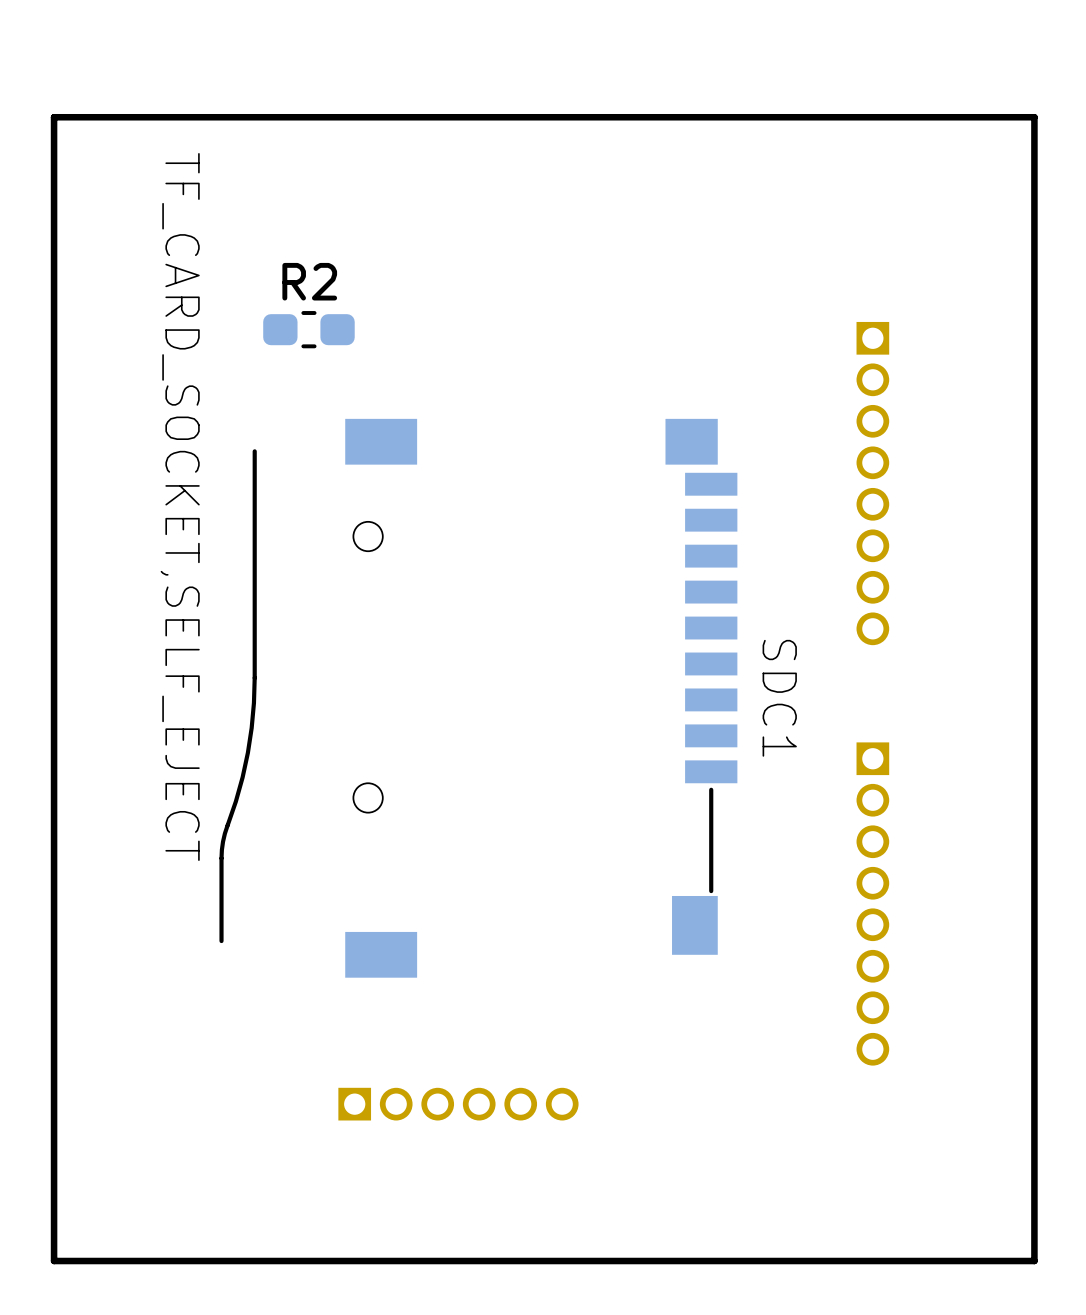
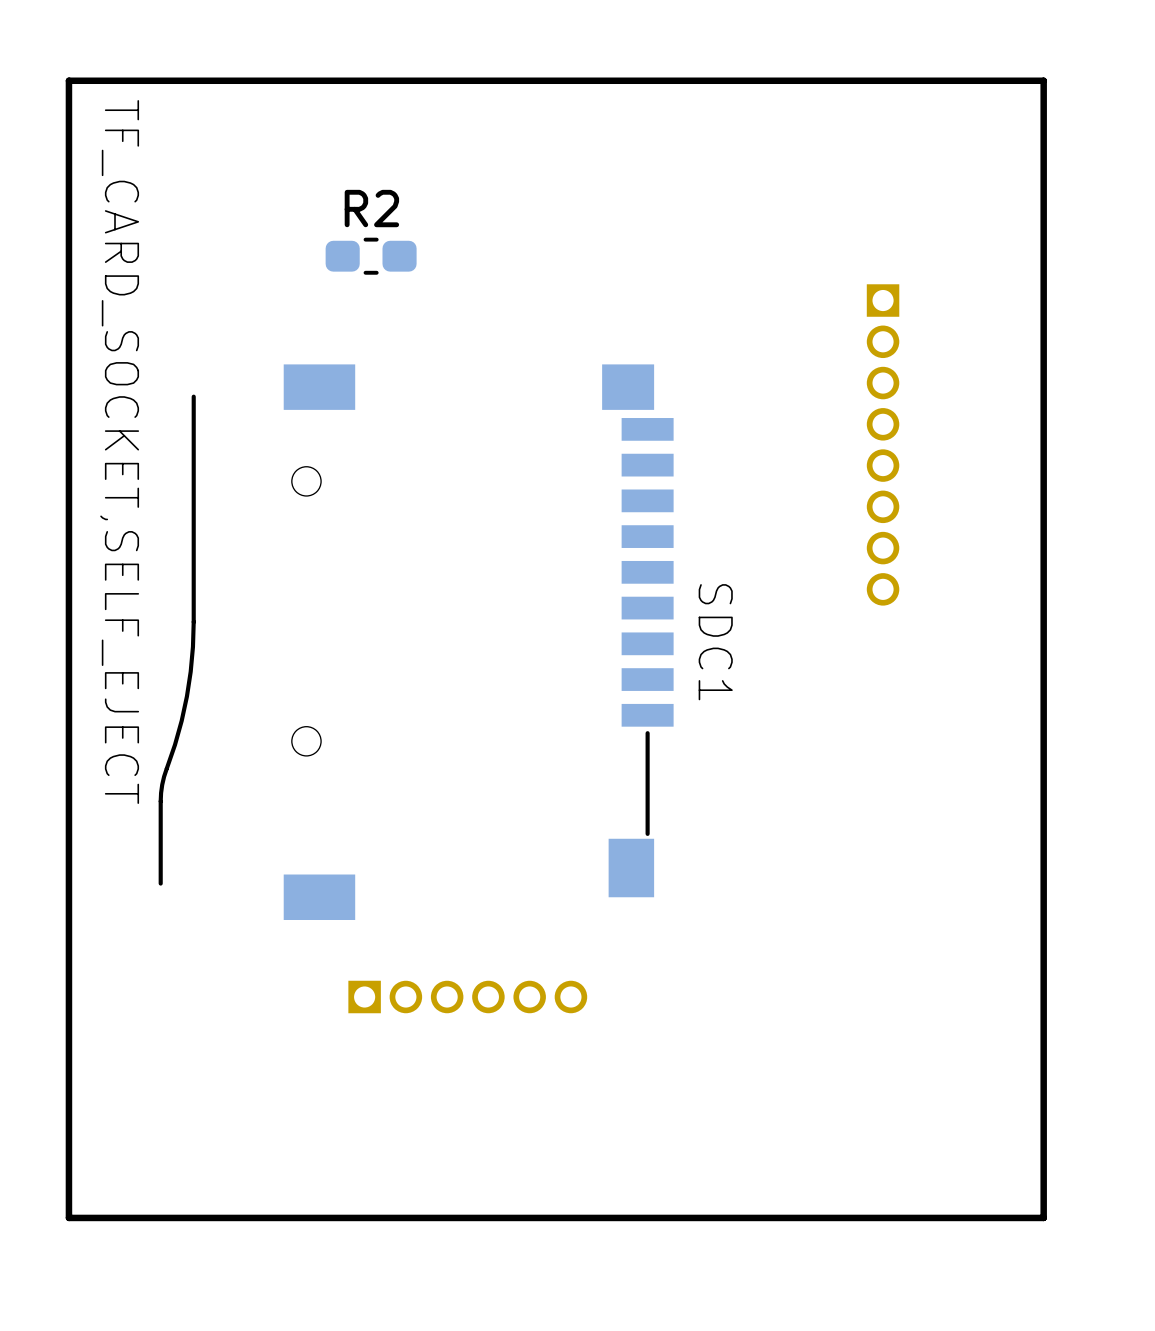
R2 position: (308, 329) -> (371, 256)
SDC1 position: (478, 698) -> (416, 642)
part: (872, 904) -> none
part position: (458, 1104) -> (467, 997)

